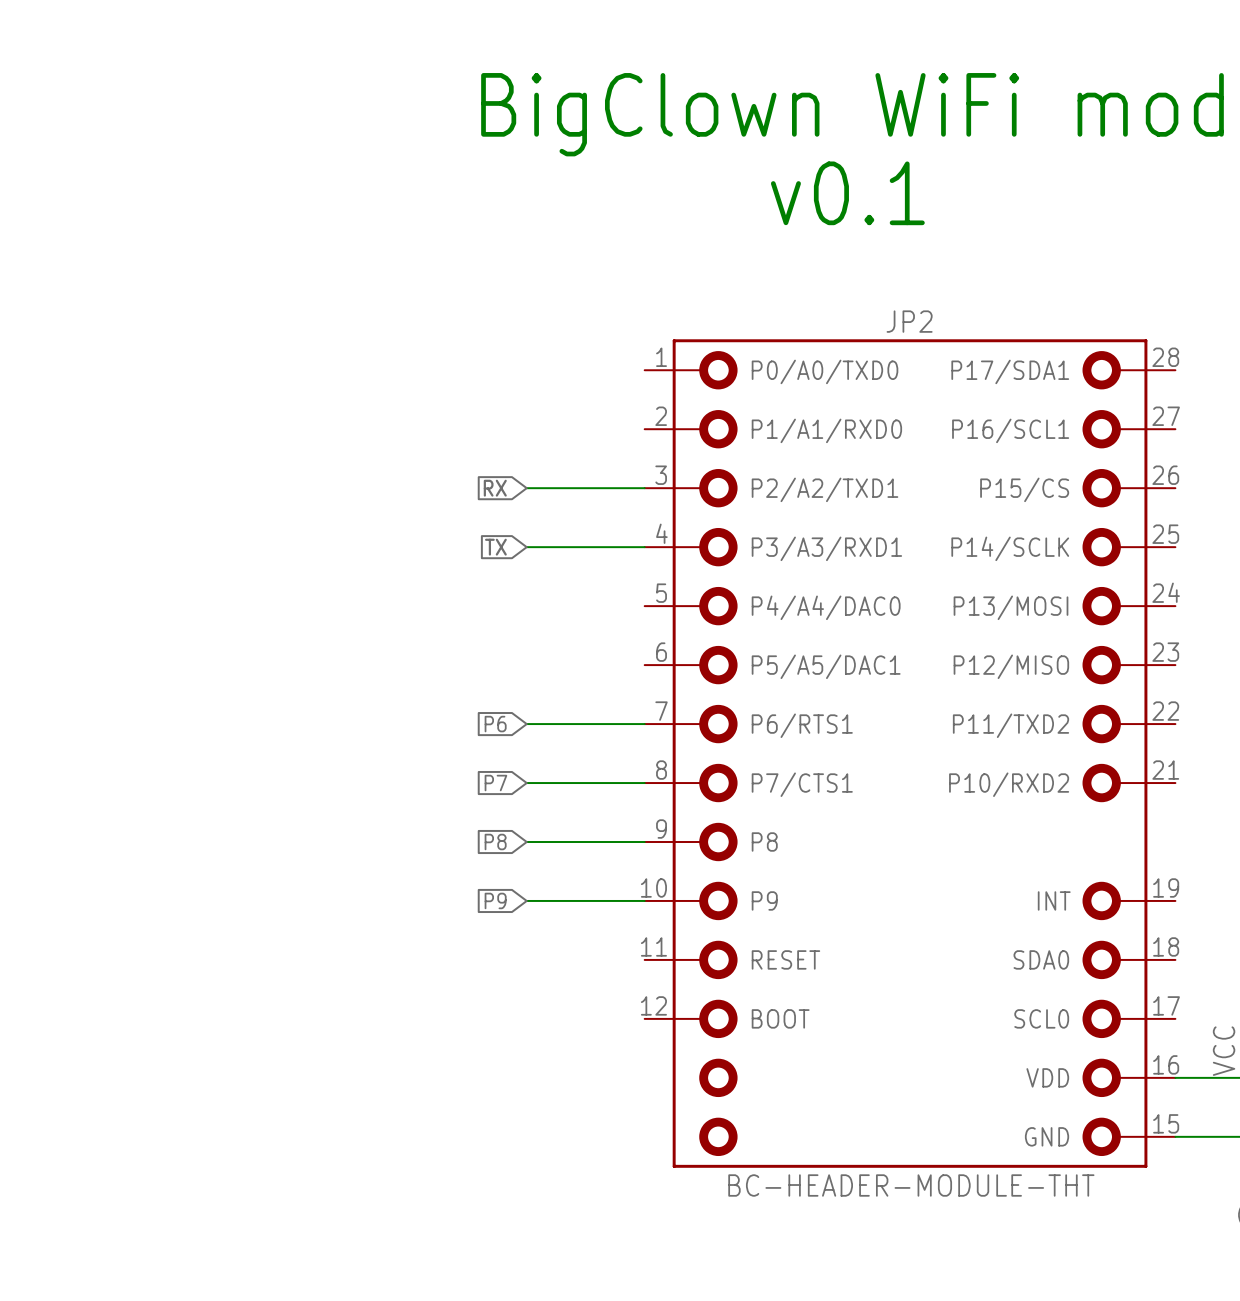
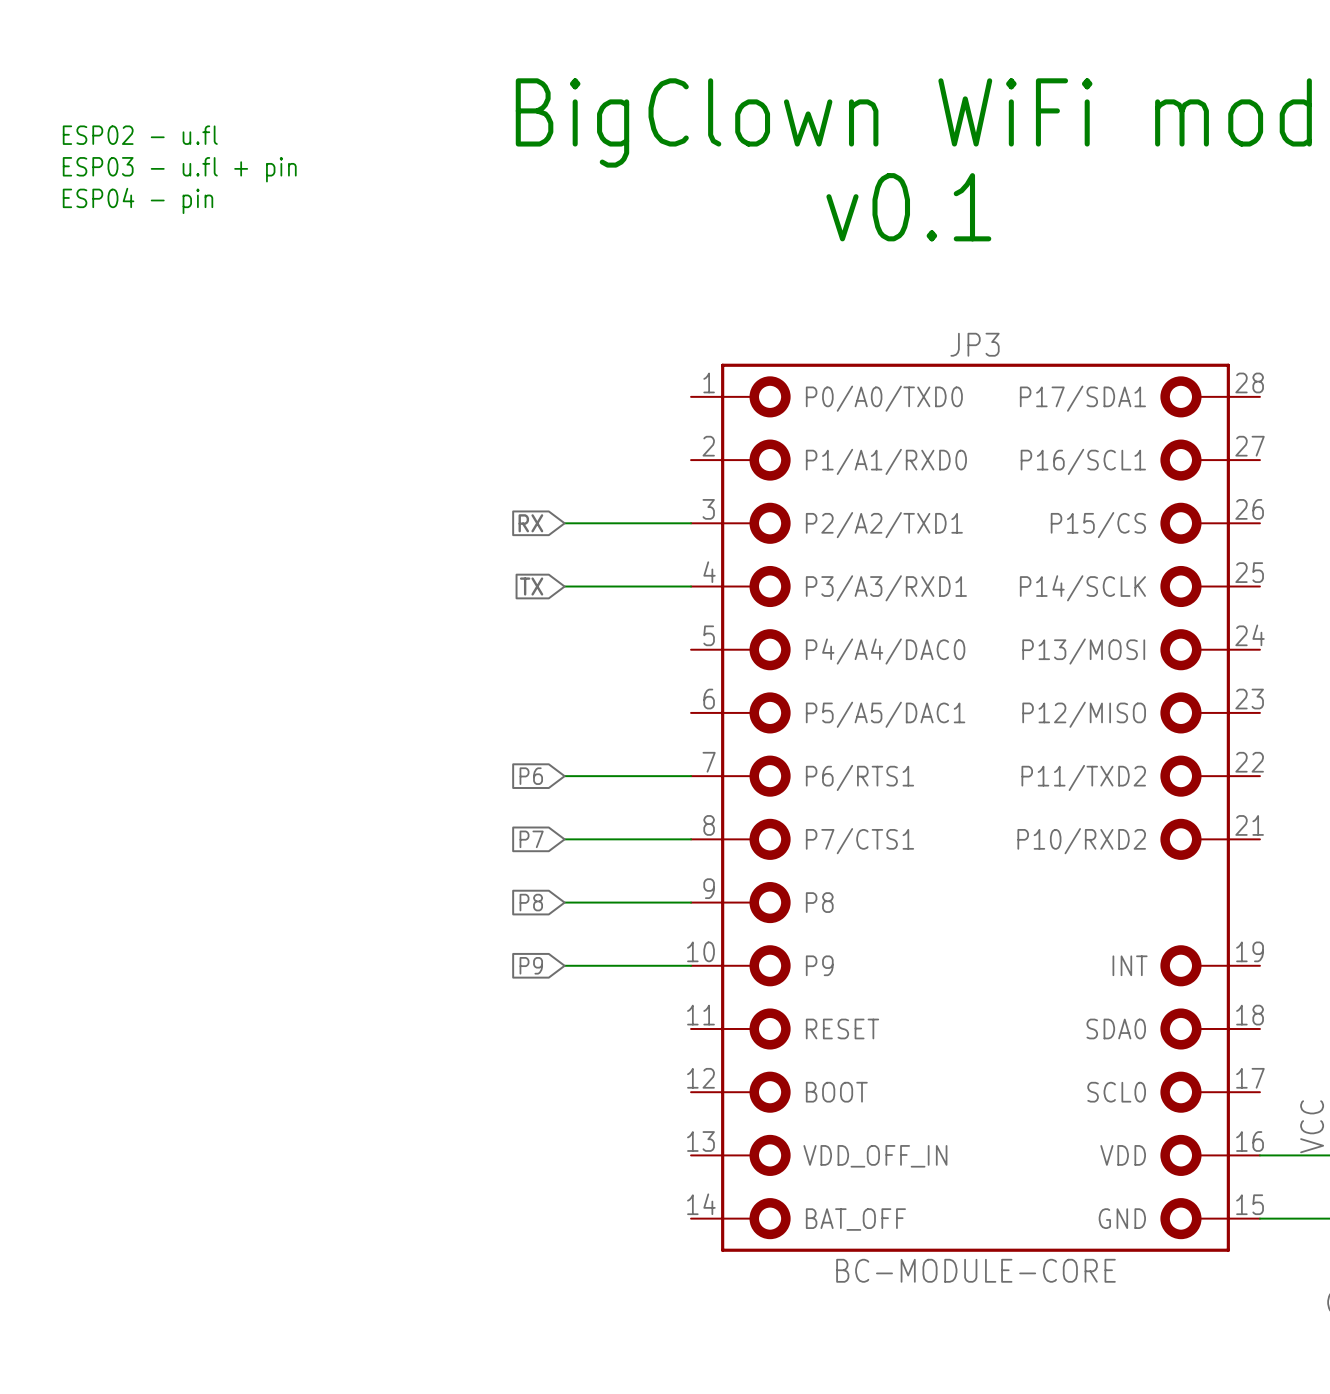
text: none -> ESP02 - u.fl (140, 135)
text: none -> ESP03 - u.fl + pin (179, 169)
text: none -> ESP04 - pin (137, 200)
JP2: BC-HEADER-MODULE-THT (910, 753) -> none
JP3: none -> BC-MODULE-CORE (975, 807)

